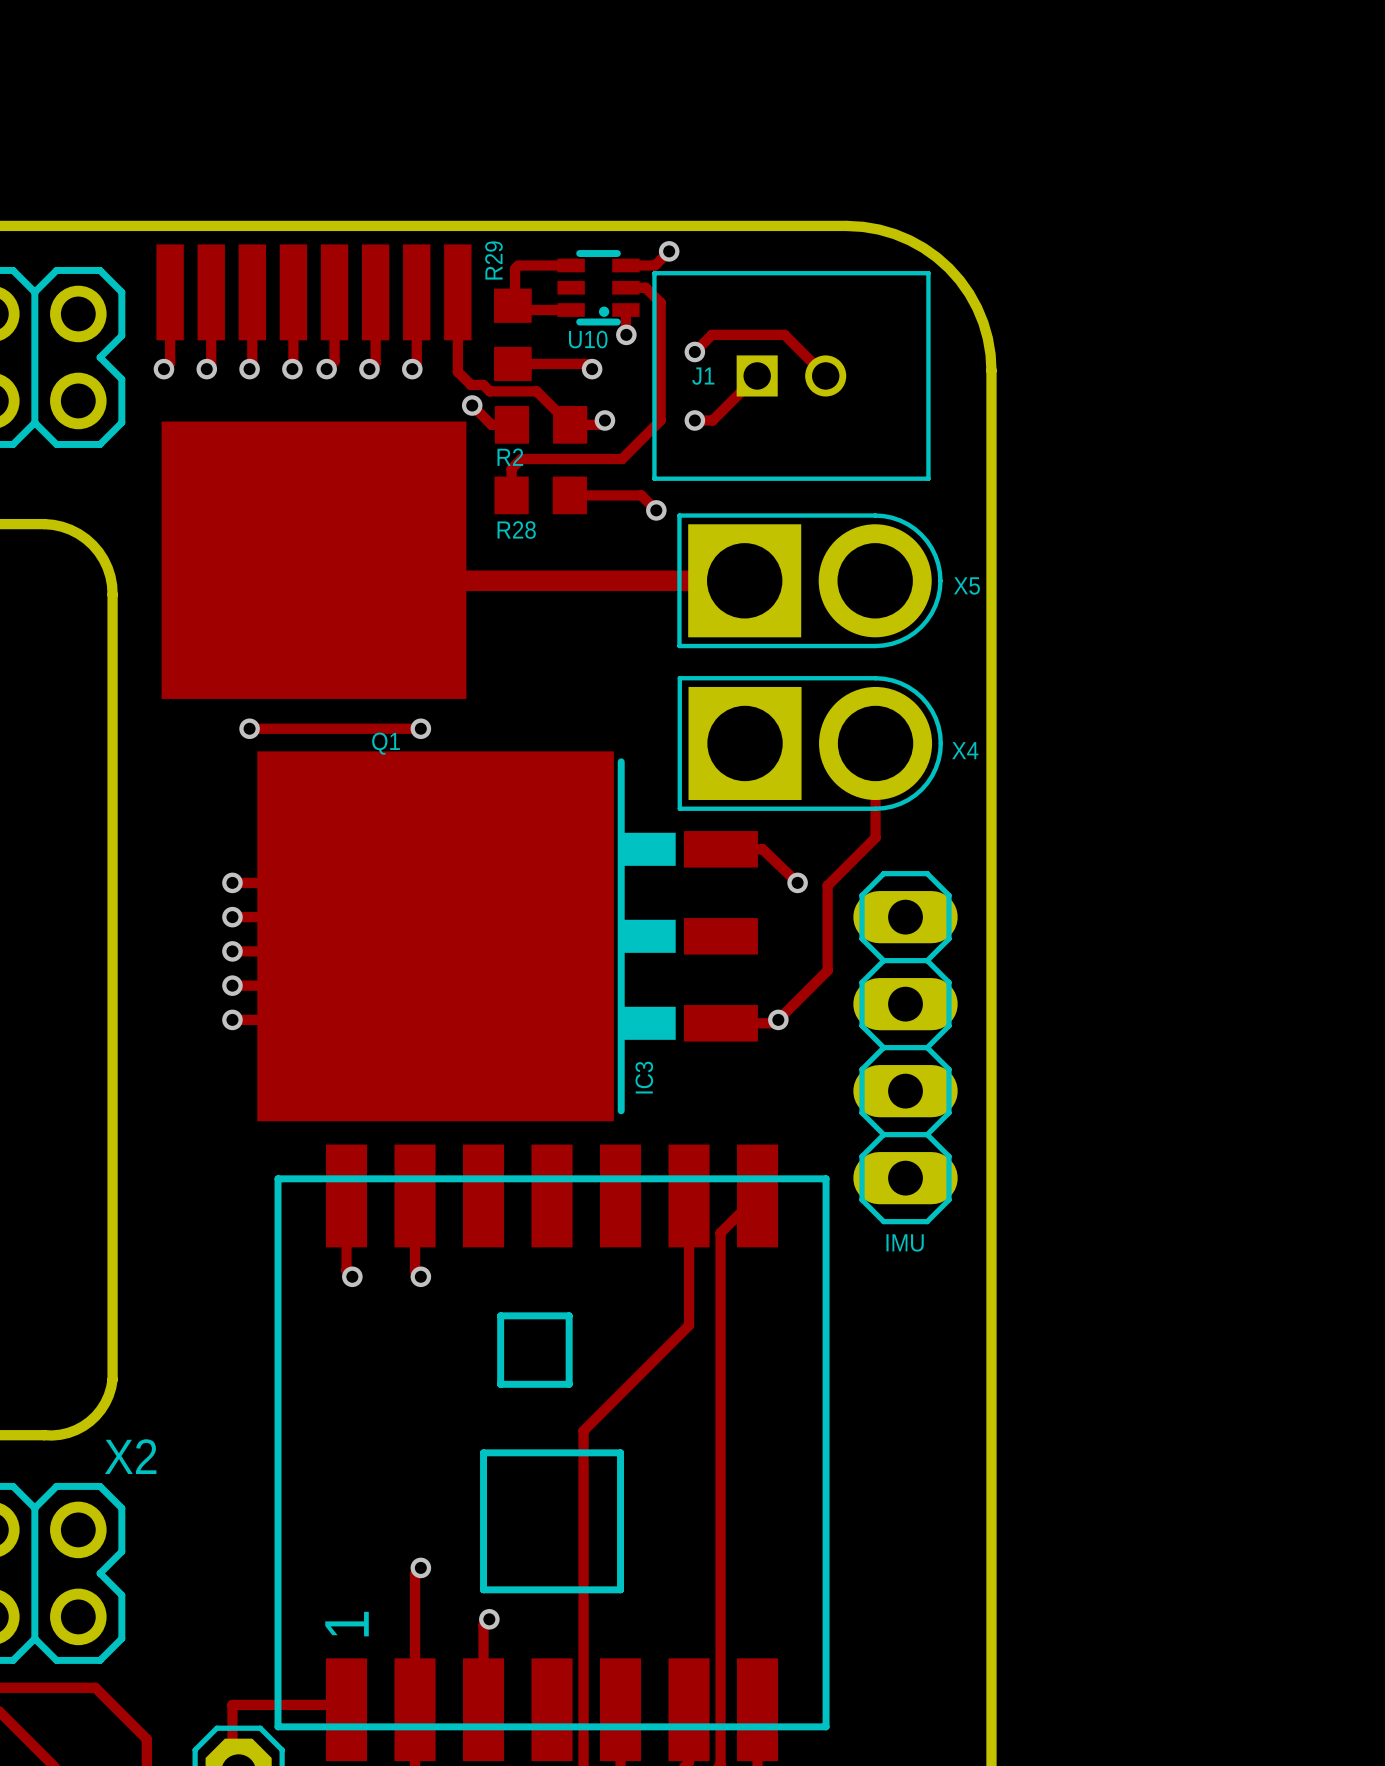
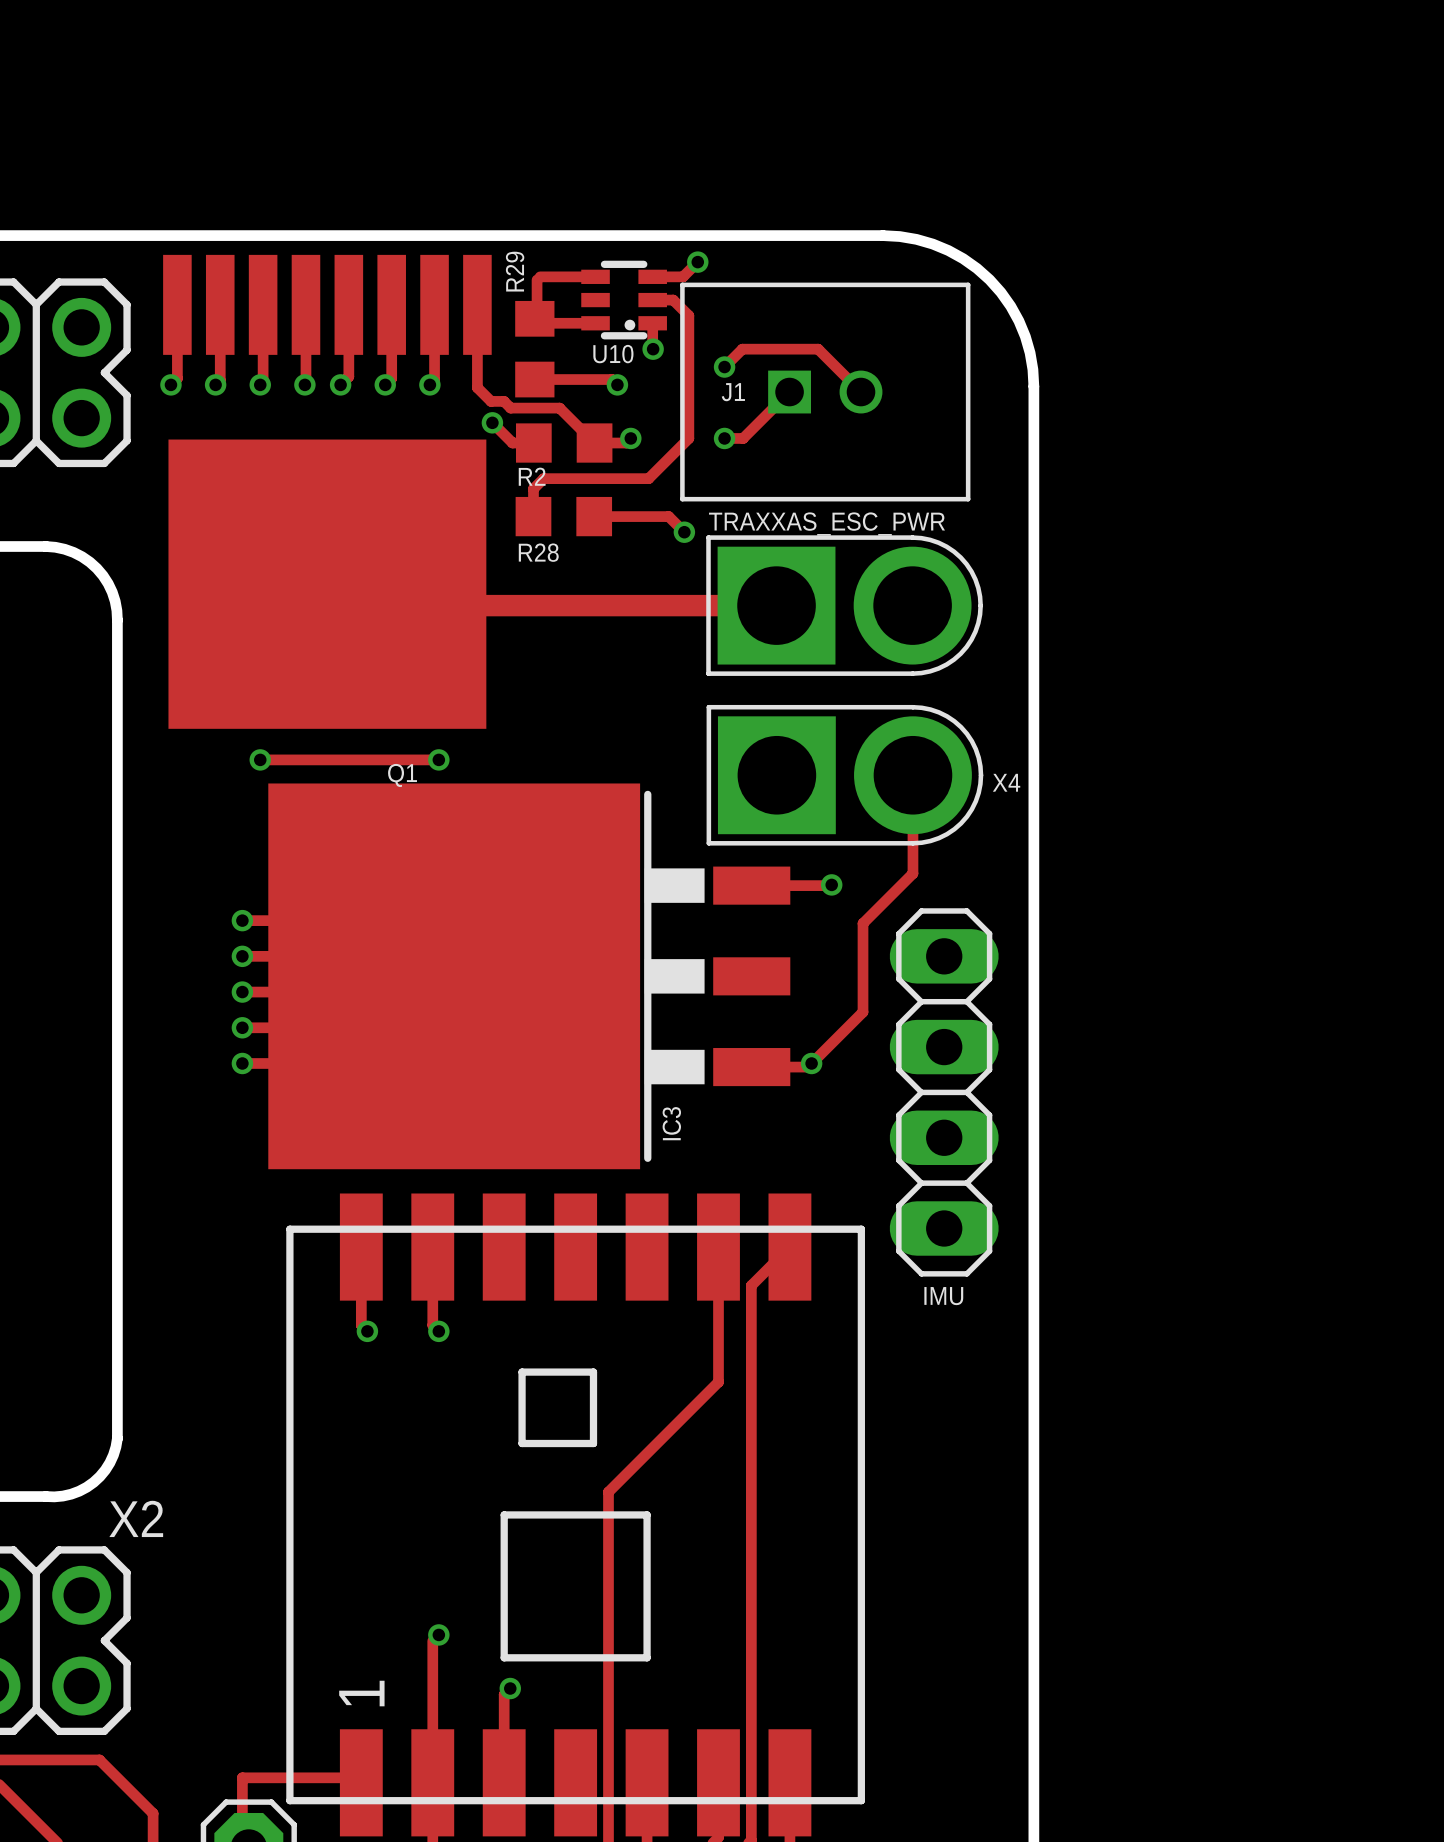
X5 name: X5 (966, 585) -> TRAXXAS_ESC_PWR (827, 524)
track: (762, 849) (797, 882) -> (795, 885) (831, 884)
via position: (797, 882) -> (831, 884)

